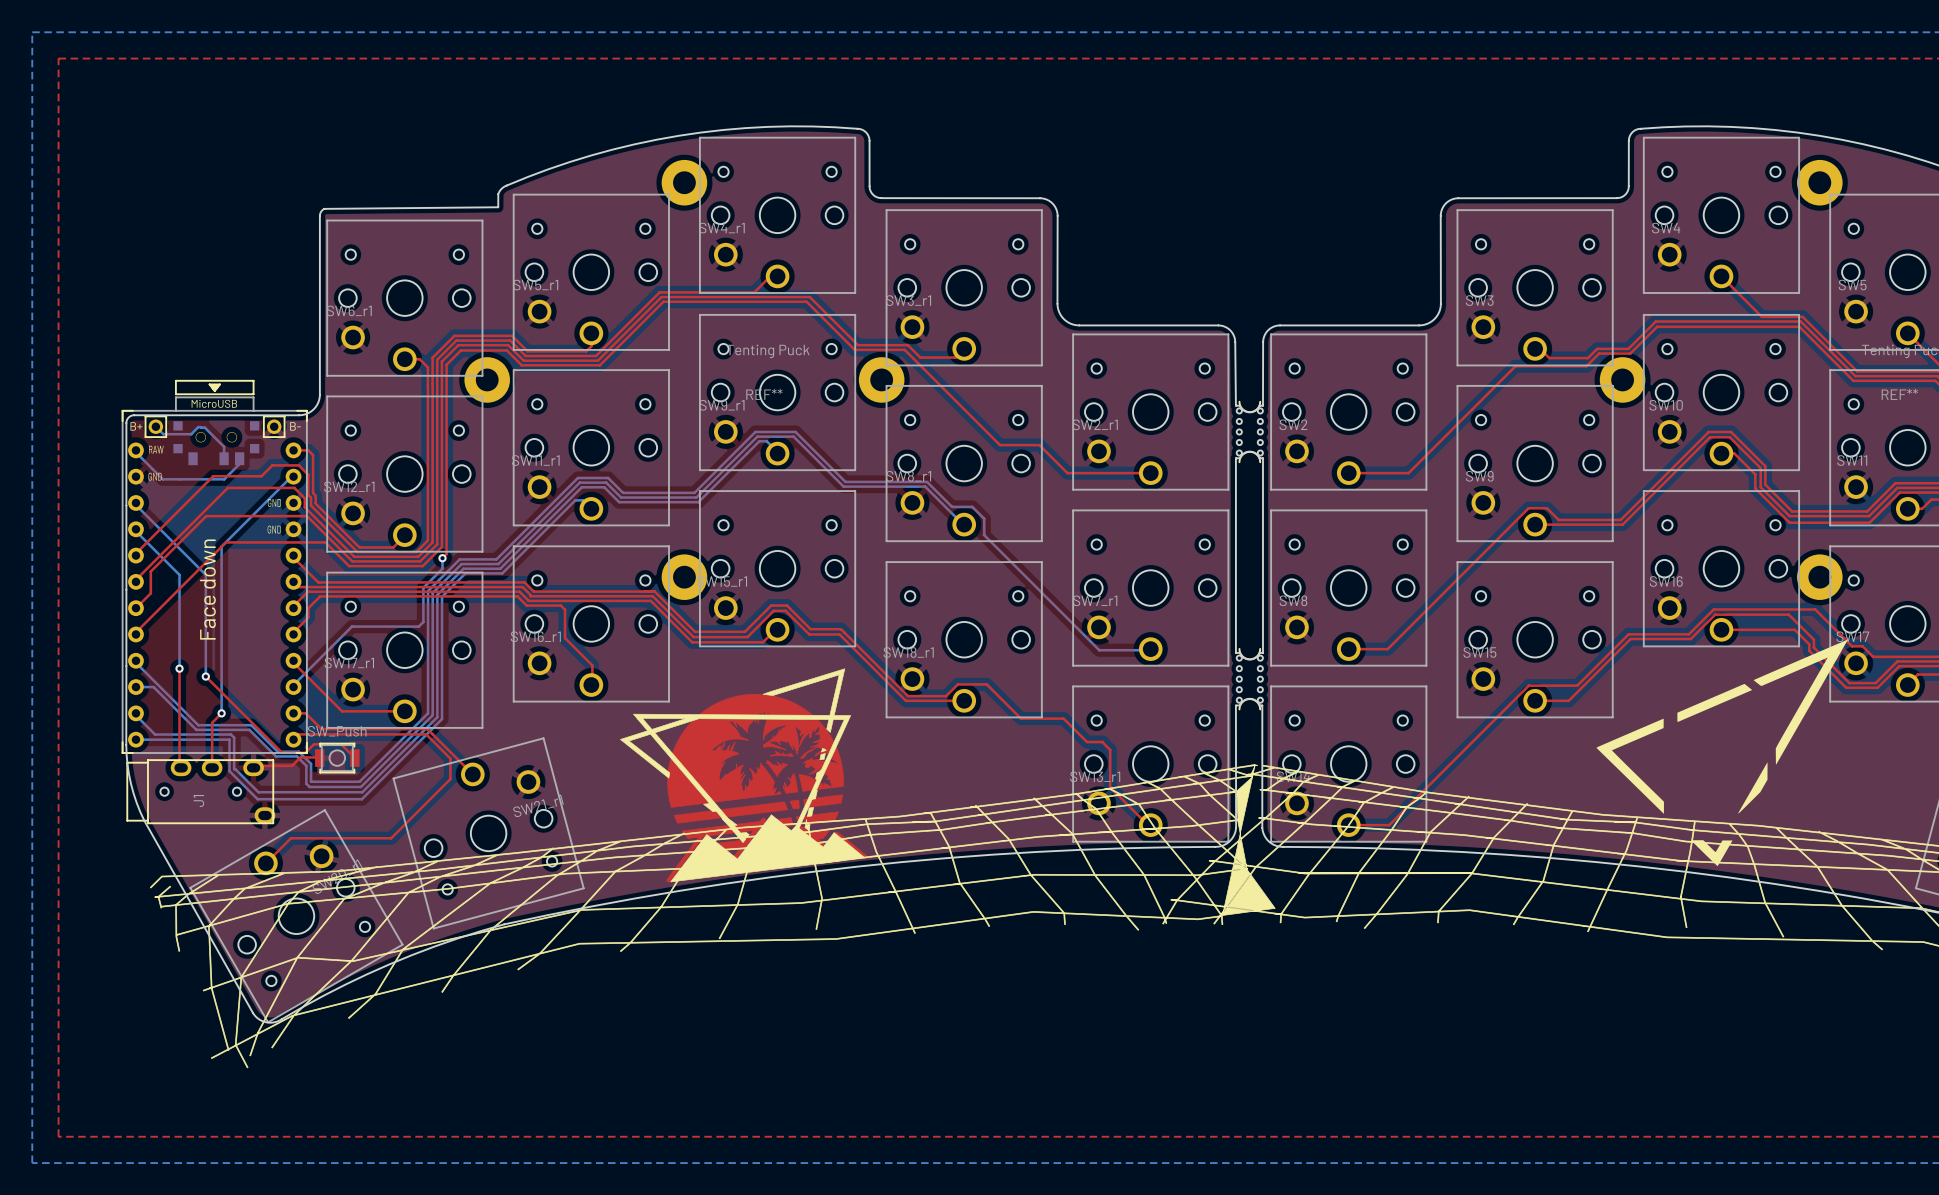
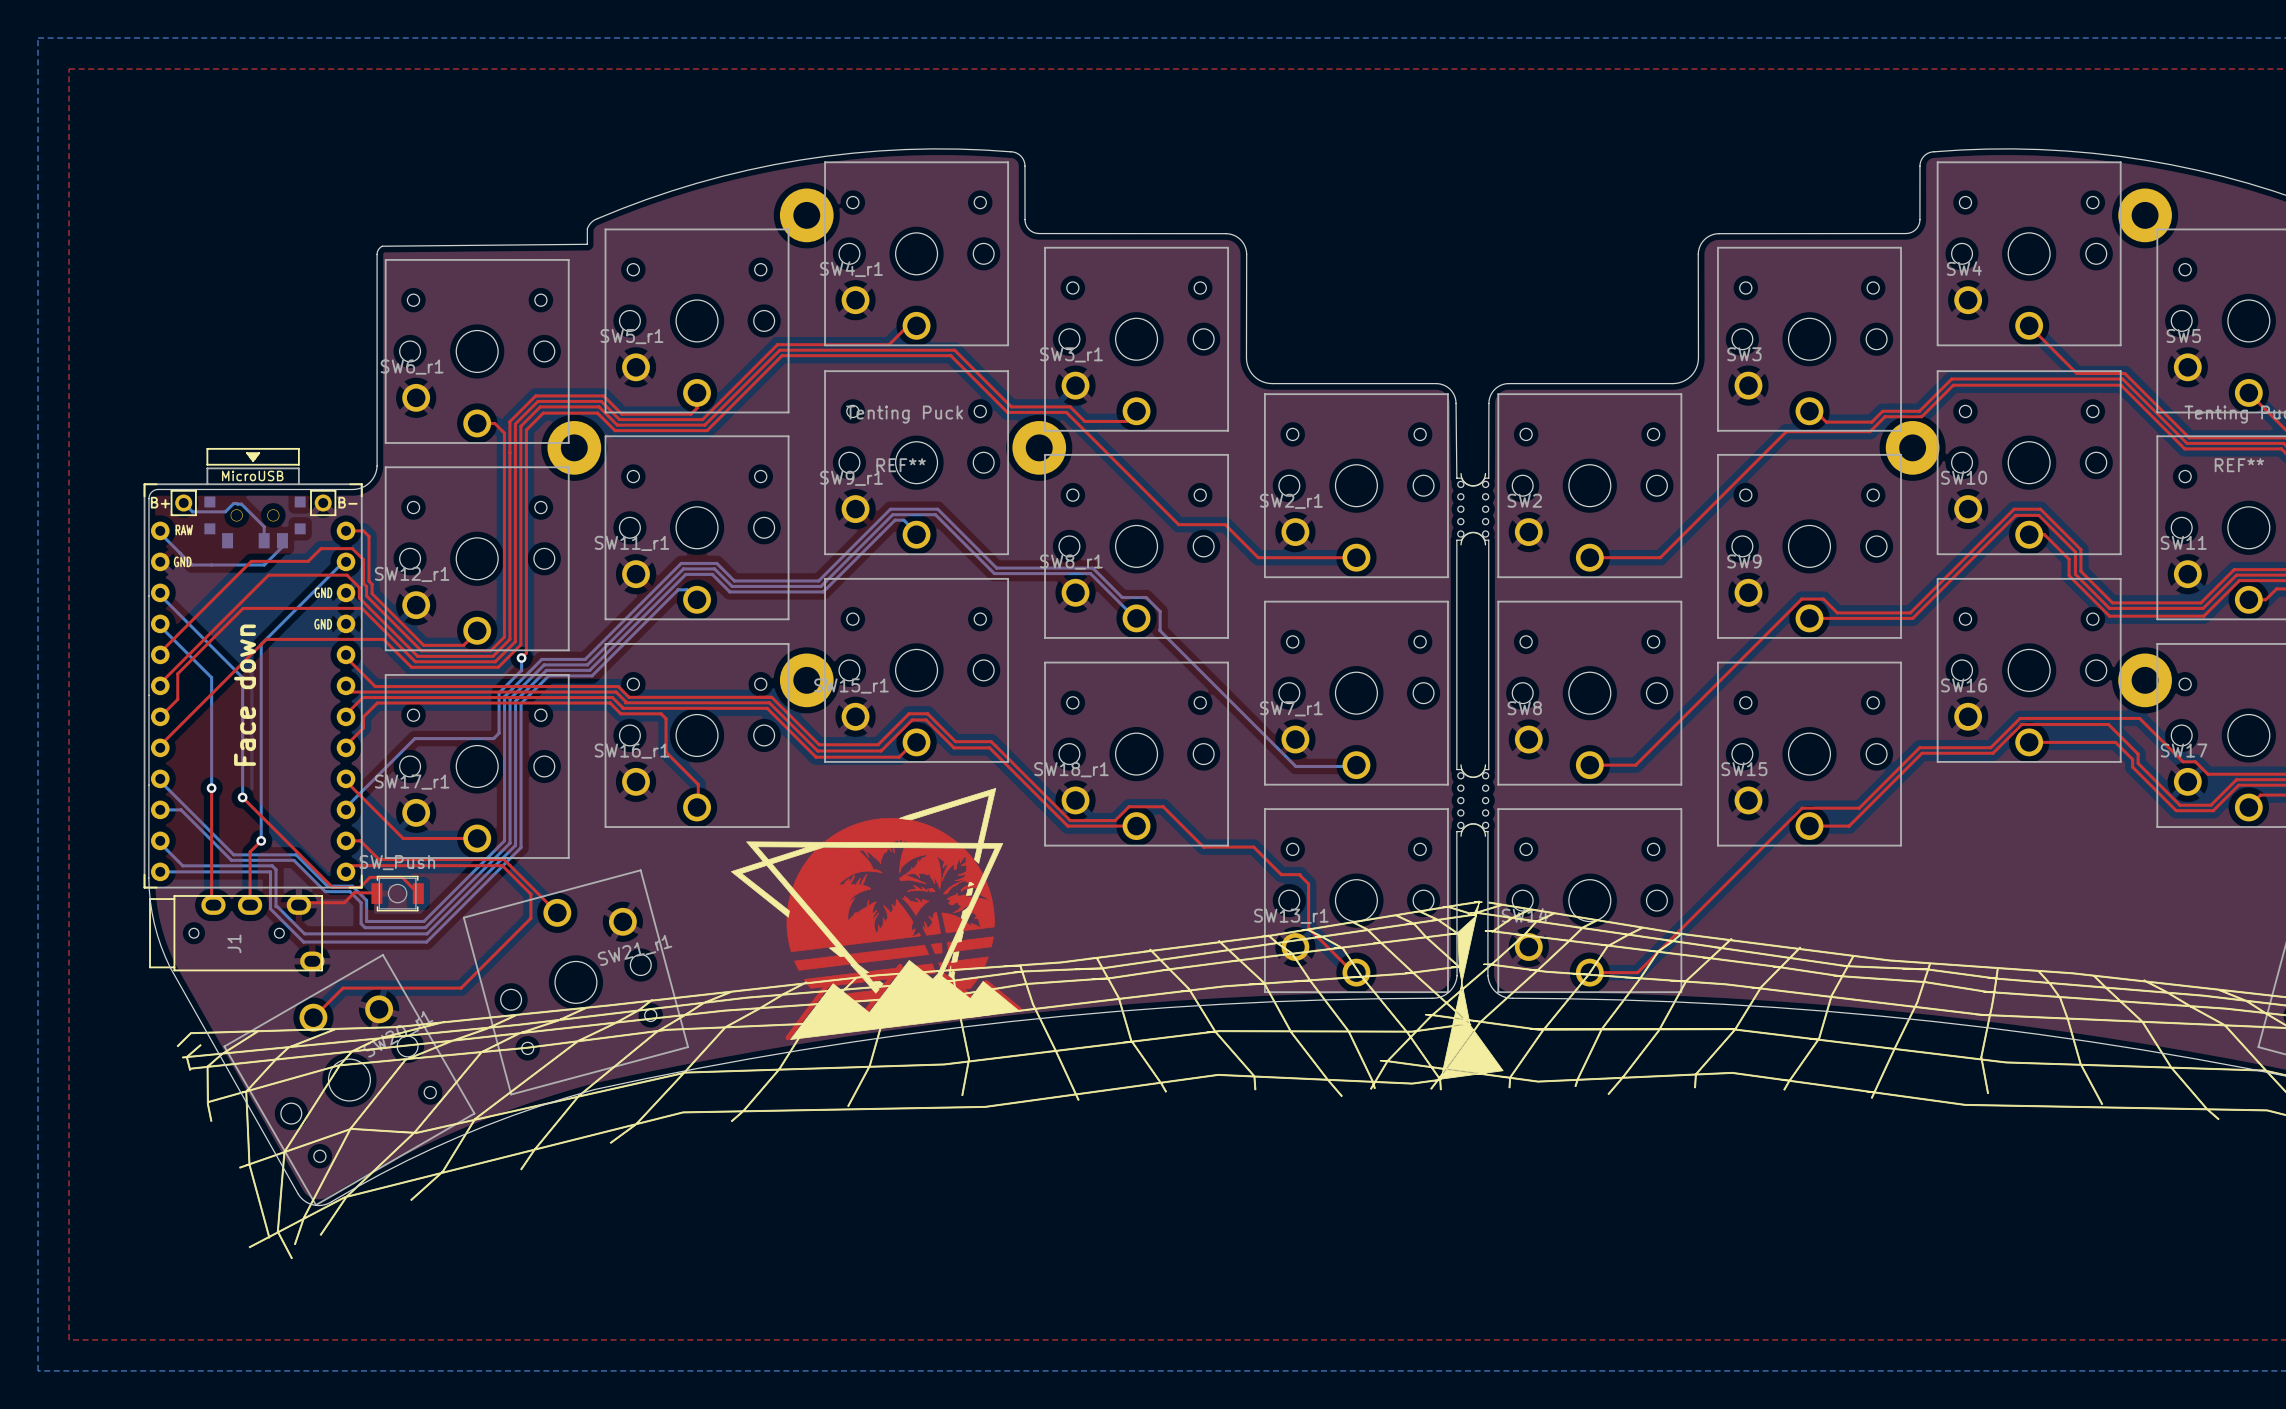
drawing: [1596, 639, 1848, 867] -> none

